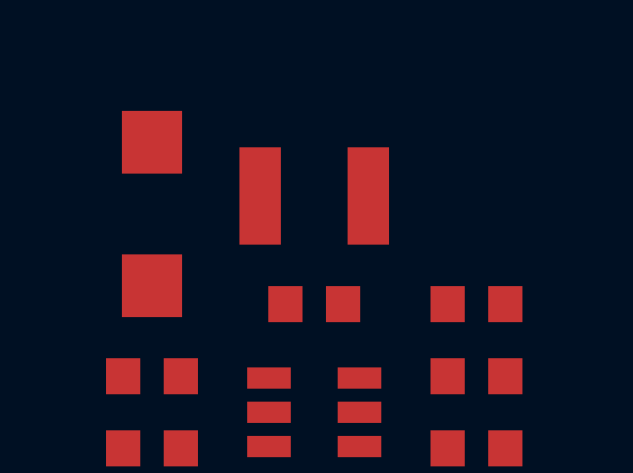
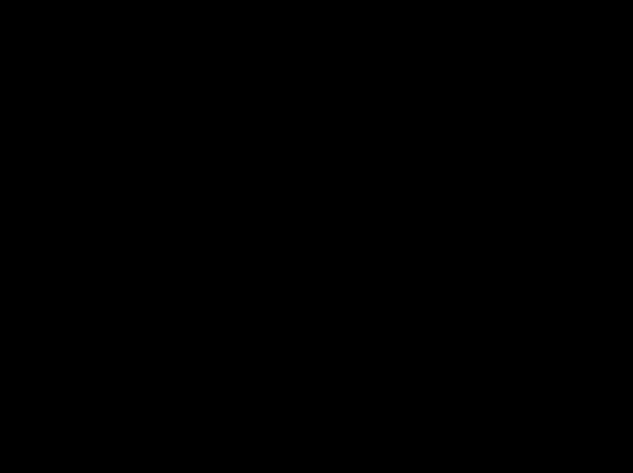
part: (314, 195) -> none
part: (151, 213) -> none
part: (314, 304) -> none
part: (476, 304) -> none
part: (151, 376) -> none
part: (476, 376) -> none
part: (314, 412) -> none
part: (151, 448) -> none
part: (476, 448) -> none

